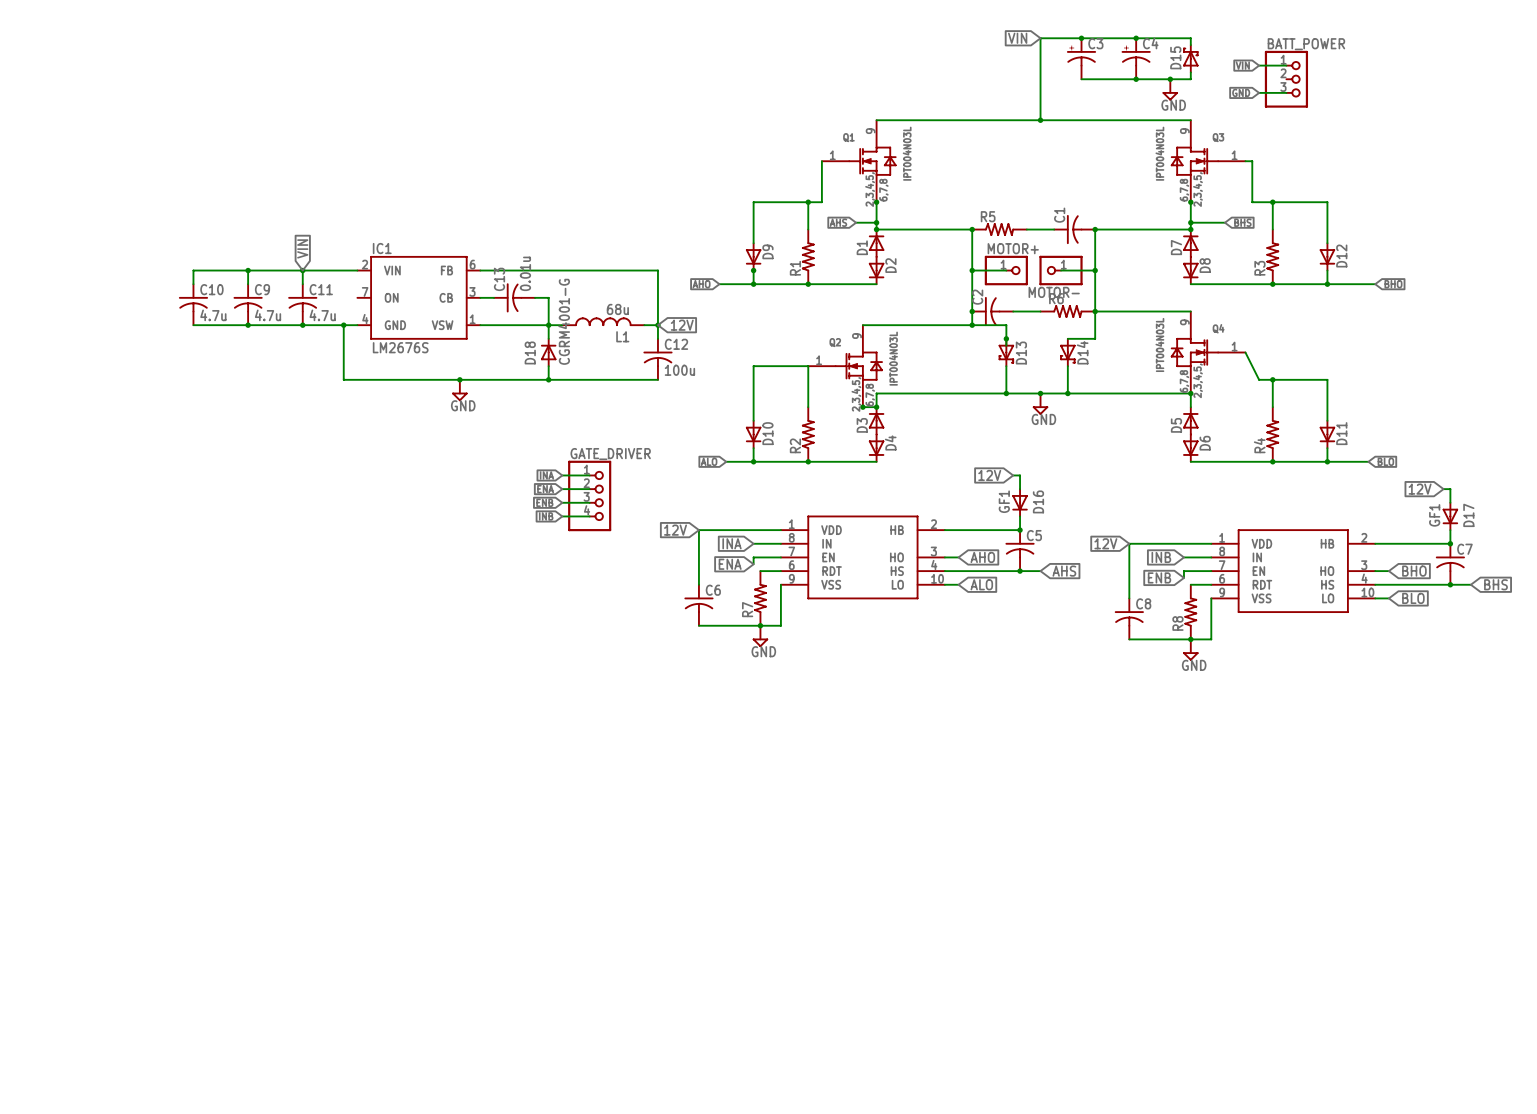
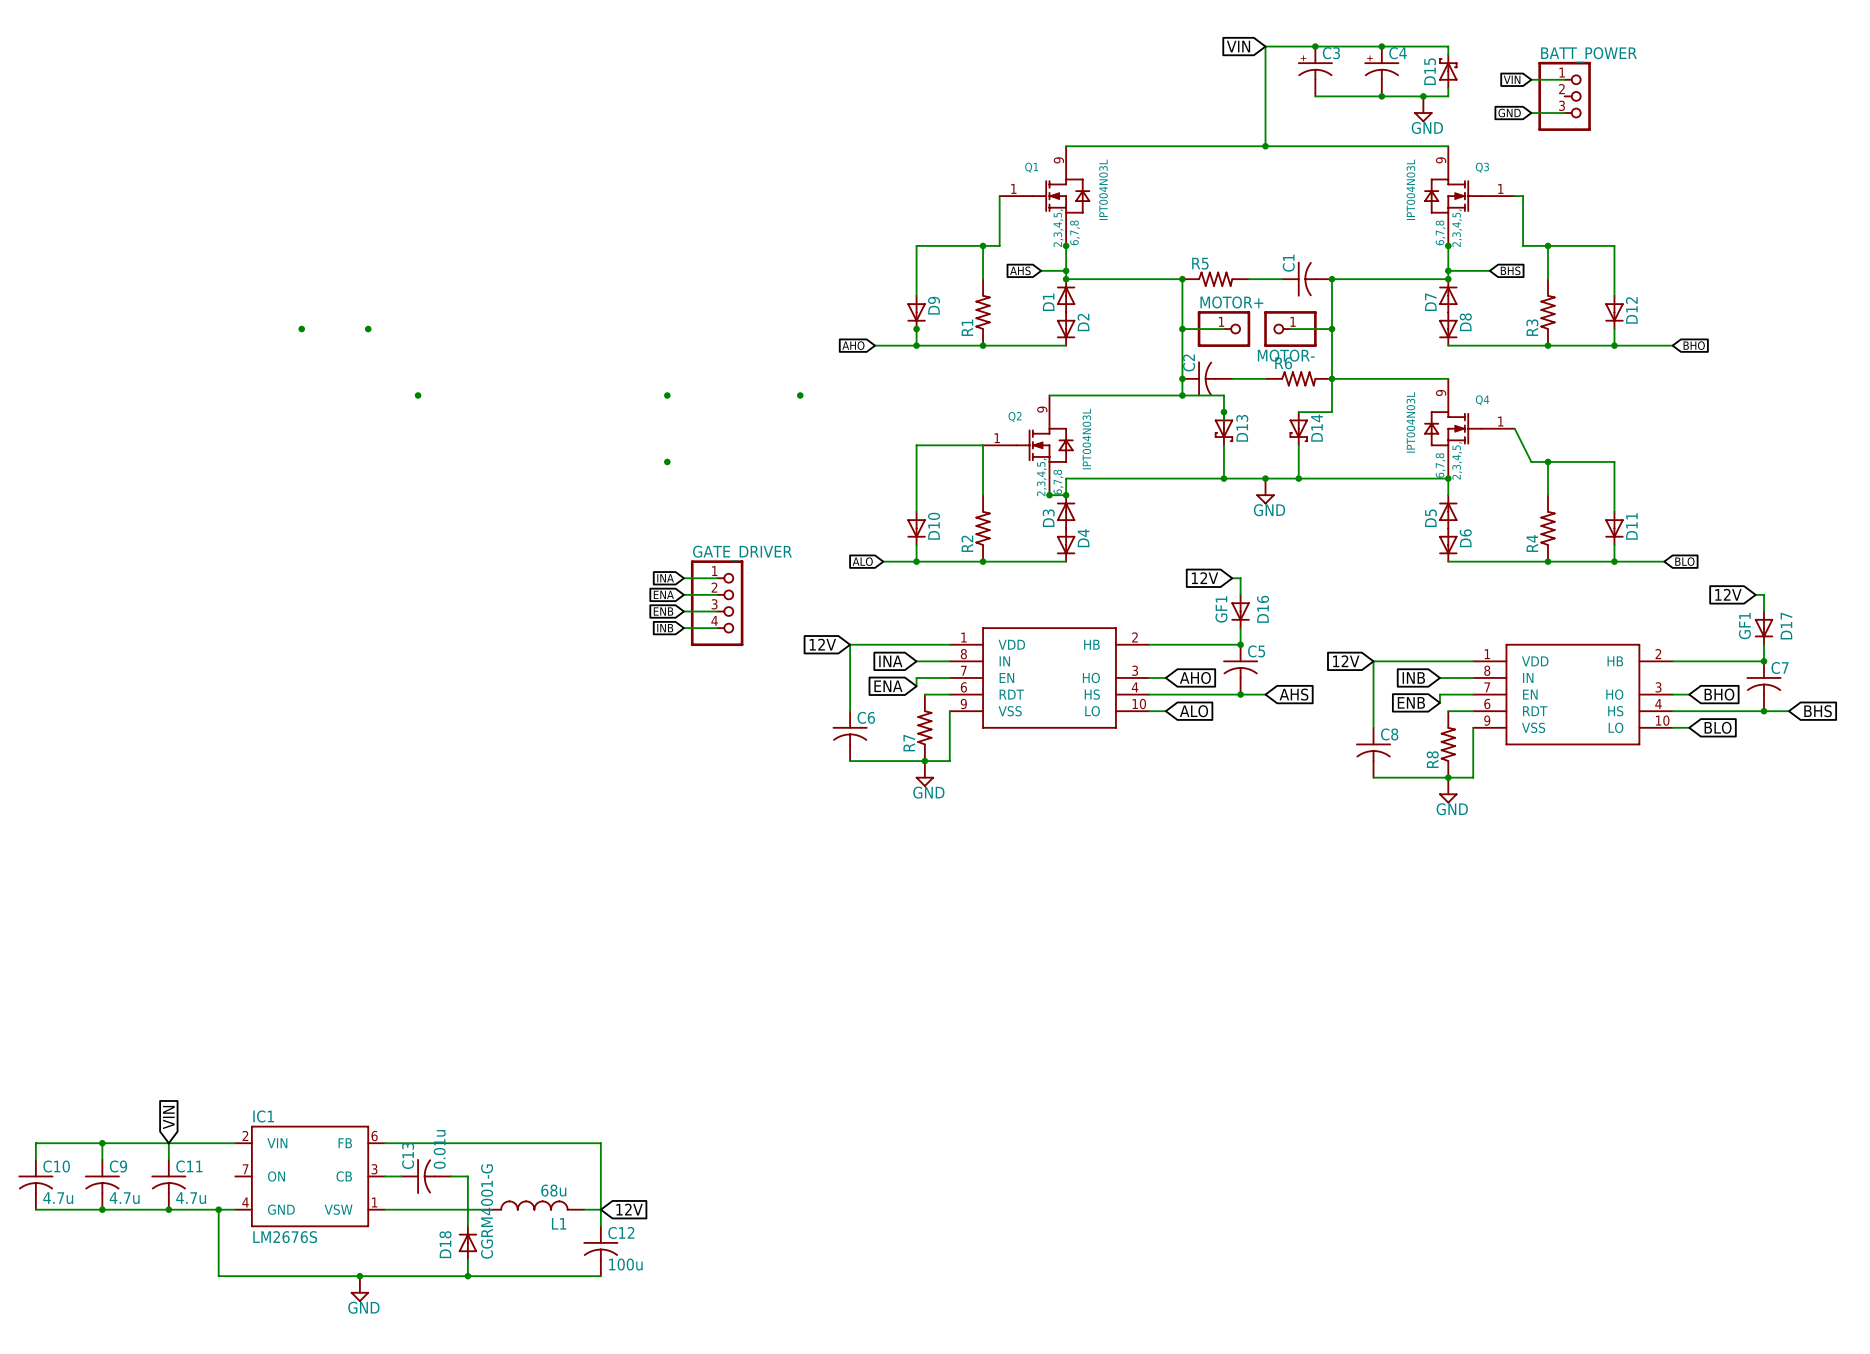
global label: VIN (302, 248) -> none
wire: (248, 270) (248, 284) -> none
wire: (302, 270) (302, 284) -> none
wire: (357, 270) (193, 270) (193, 284) -> none
wire: (480, 270) (657, 270) (657, 338) -> none
IC1 position: (418, 297) -> (310, 1176)
wire: (480, 297) (494, 297) -> none
C13 position: (514, 297) -> (426, 1176)
wire: (535, 297) (548, 297) (548, 338) -> none
C10 position: (193, 304) -> (35, 1184)
C9 position: (248, 304) -> (102, 1184)
C11 position: (302, 304) -> (168, 1184)
L1 position: (603, 321) -> (534, 1205)
wire: (193, 325) (357, 325) -> none
junction: (248, 325) -> none
junction: (302, 325) -> none
wire: (343, 325) (343, 379) (657, 379) -> none
wire: (480, 325) (562, 325) -> none
wire: (644, 325) (657, 325) -> none
global label: 12V (682, 325) -> none
D18 position: (548, 352) -> (467, 1242)
C12 position: (657, 359) -> (600, 1251)
wire: (548, 366) (548, 379) -> none
junction: (459, 379) -> none
power symbol: GND (459, 390) -> none
global label: none -> VIN (168, 1117)
wire: none -> (102, 1143) (102, 1159)
junction: none -> (102, 1143)
wire: none -> (168, 1143) (168, 1159)
wire: none -> (235, 1143) (35, 1143) (35, 1159)
wire: none -> (384, 1143) (600, 1143) (600, 1226)
wire: none -> (384, 1176) (401, 1176)
wire: none -> (451, 1176) (467, 1176) (467, 1226)
wire: none -> (35, 1209) (235, 1209)
junction: none -> (102, 1209)
junction: none -> (168, 1209)
wire: none -> (218, 1209) (218, 1276) (600, 1276)
junction: none -> (218, 1209)
wire: none -> (384, 1209) (484, 1209)
wire: none -> (584, 1209) (600, 1209)
global label: none -> 12V (629, 1209)
wire: none -> (467, 1259) (467, 1276)
junction: none -> (359, 1276)
junction: none -> (467, 1276)
power symbol: none -> GND (359, 1289)

